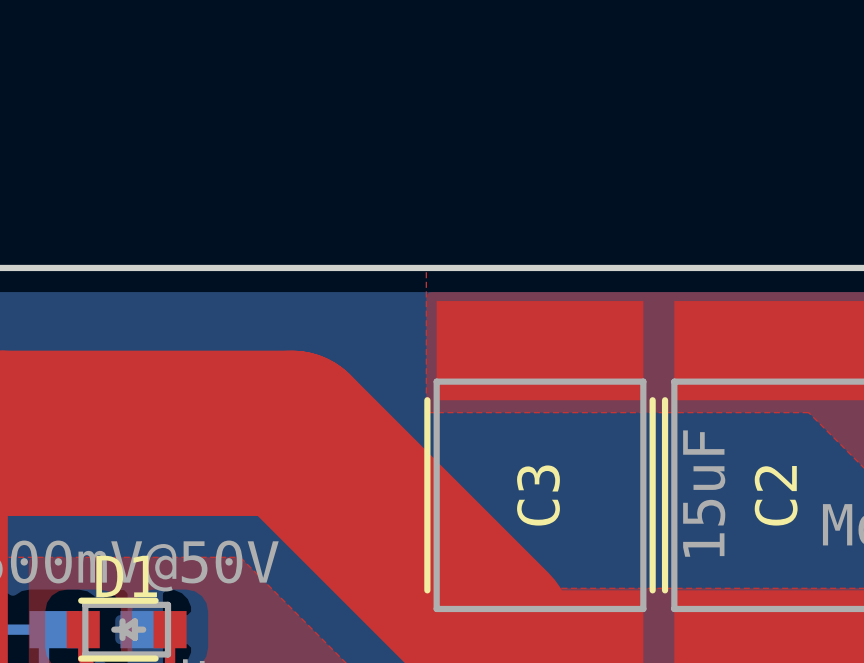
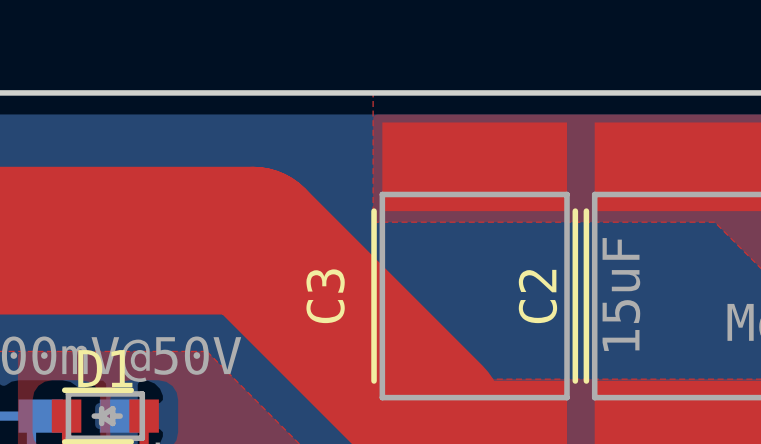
C3 name position: C3 (538, 495) -> C3 (325, 296)
C2 name position: C2 (776, 495) -> C2 (537, 296)

